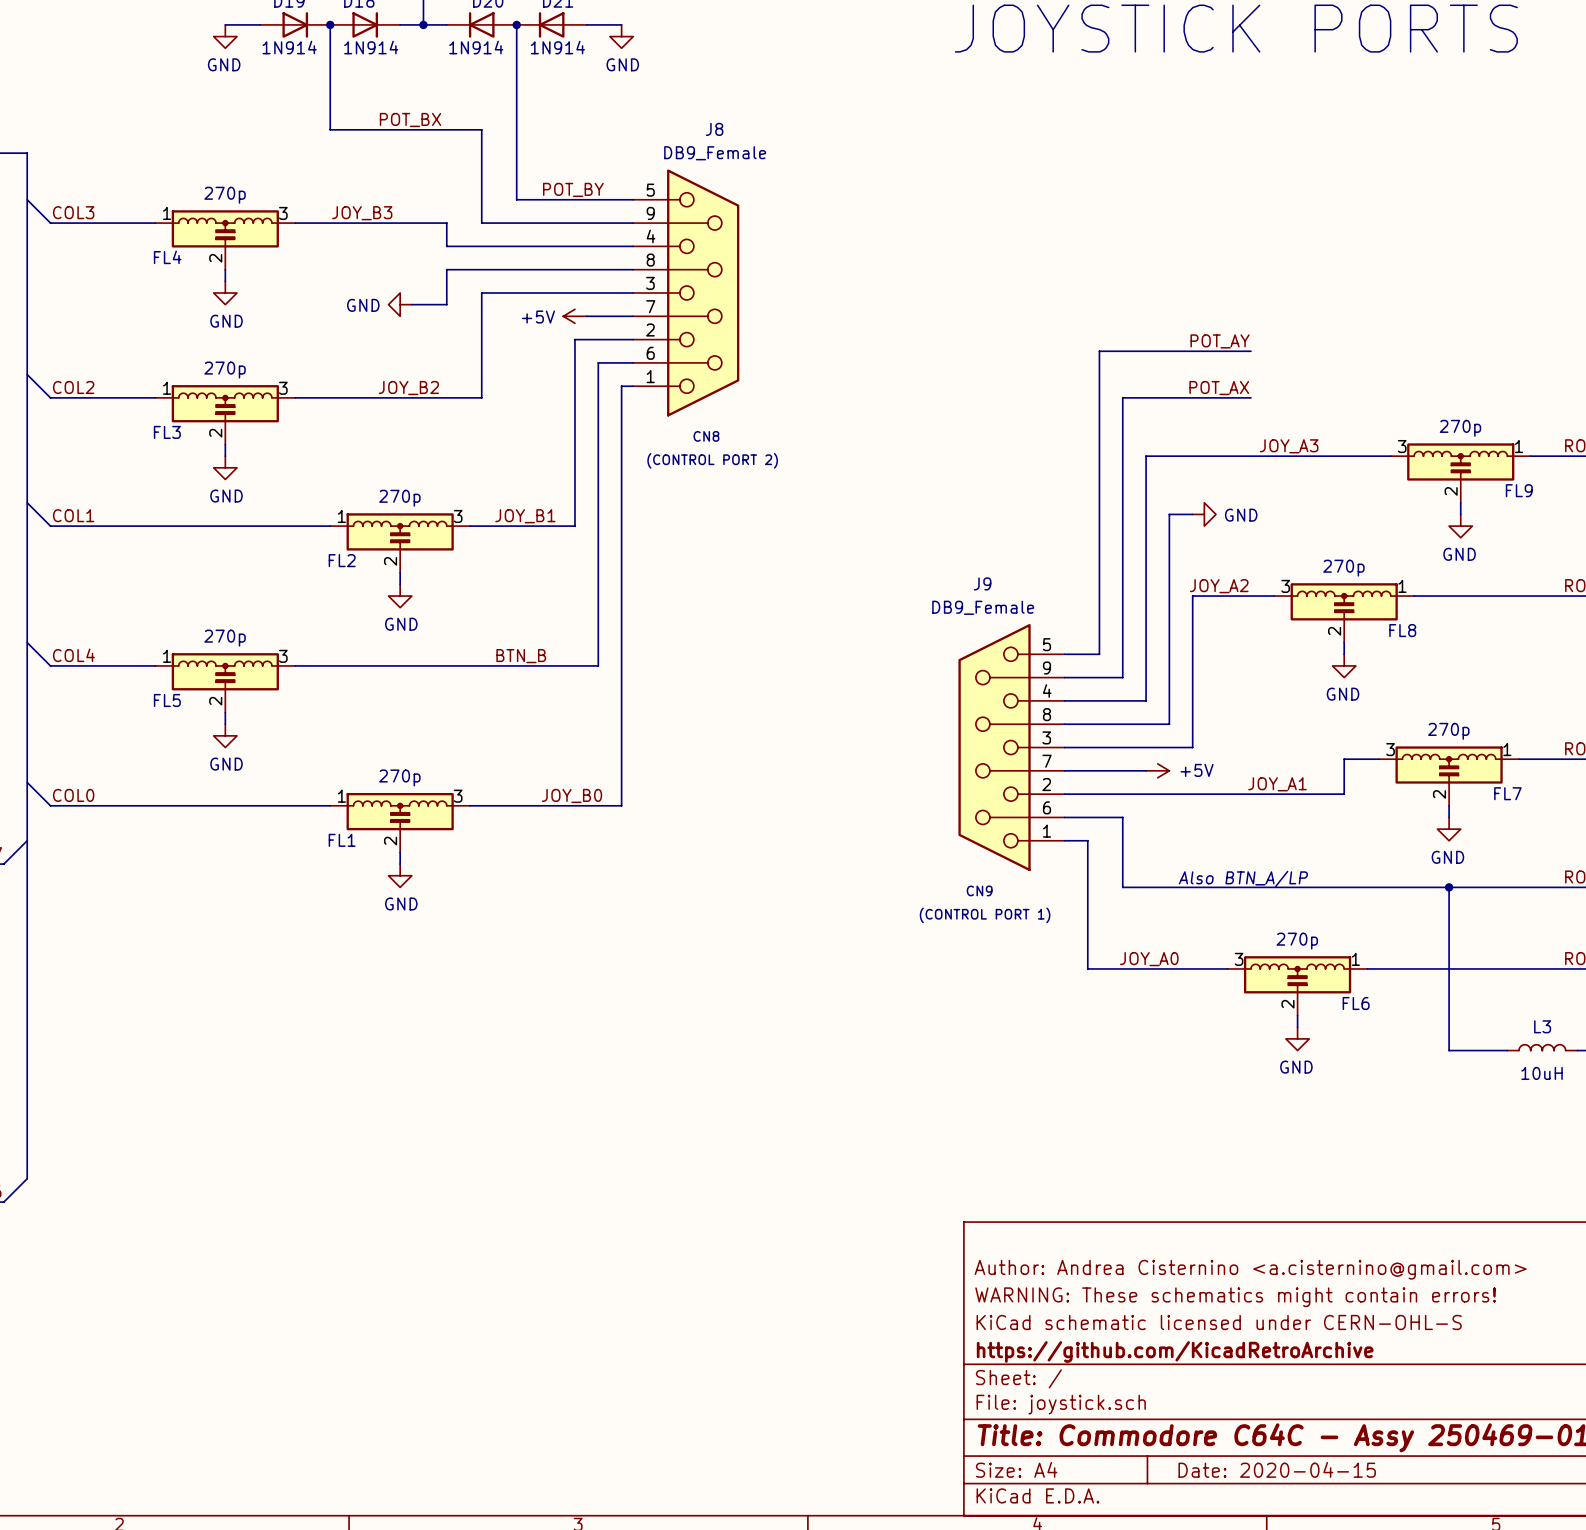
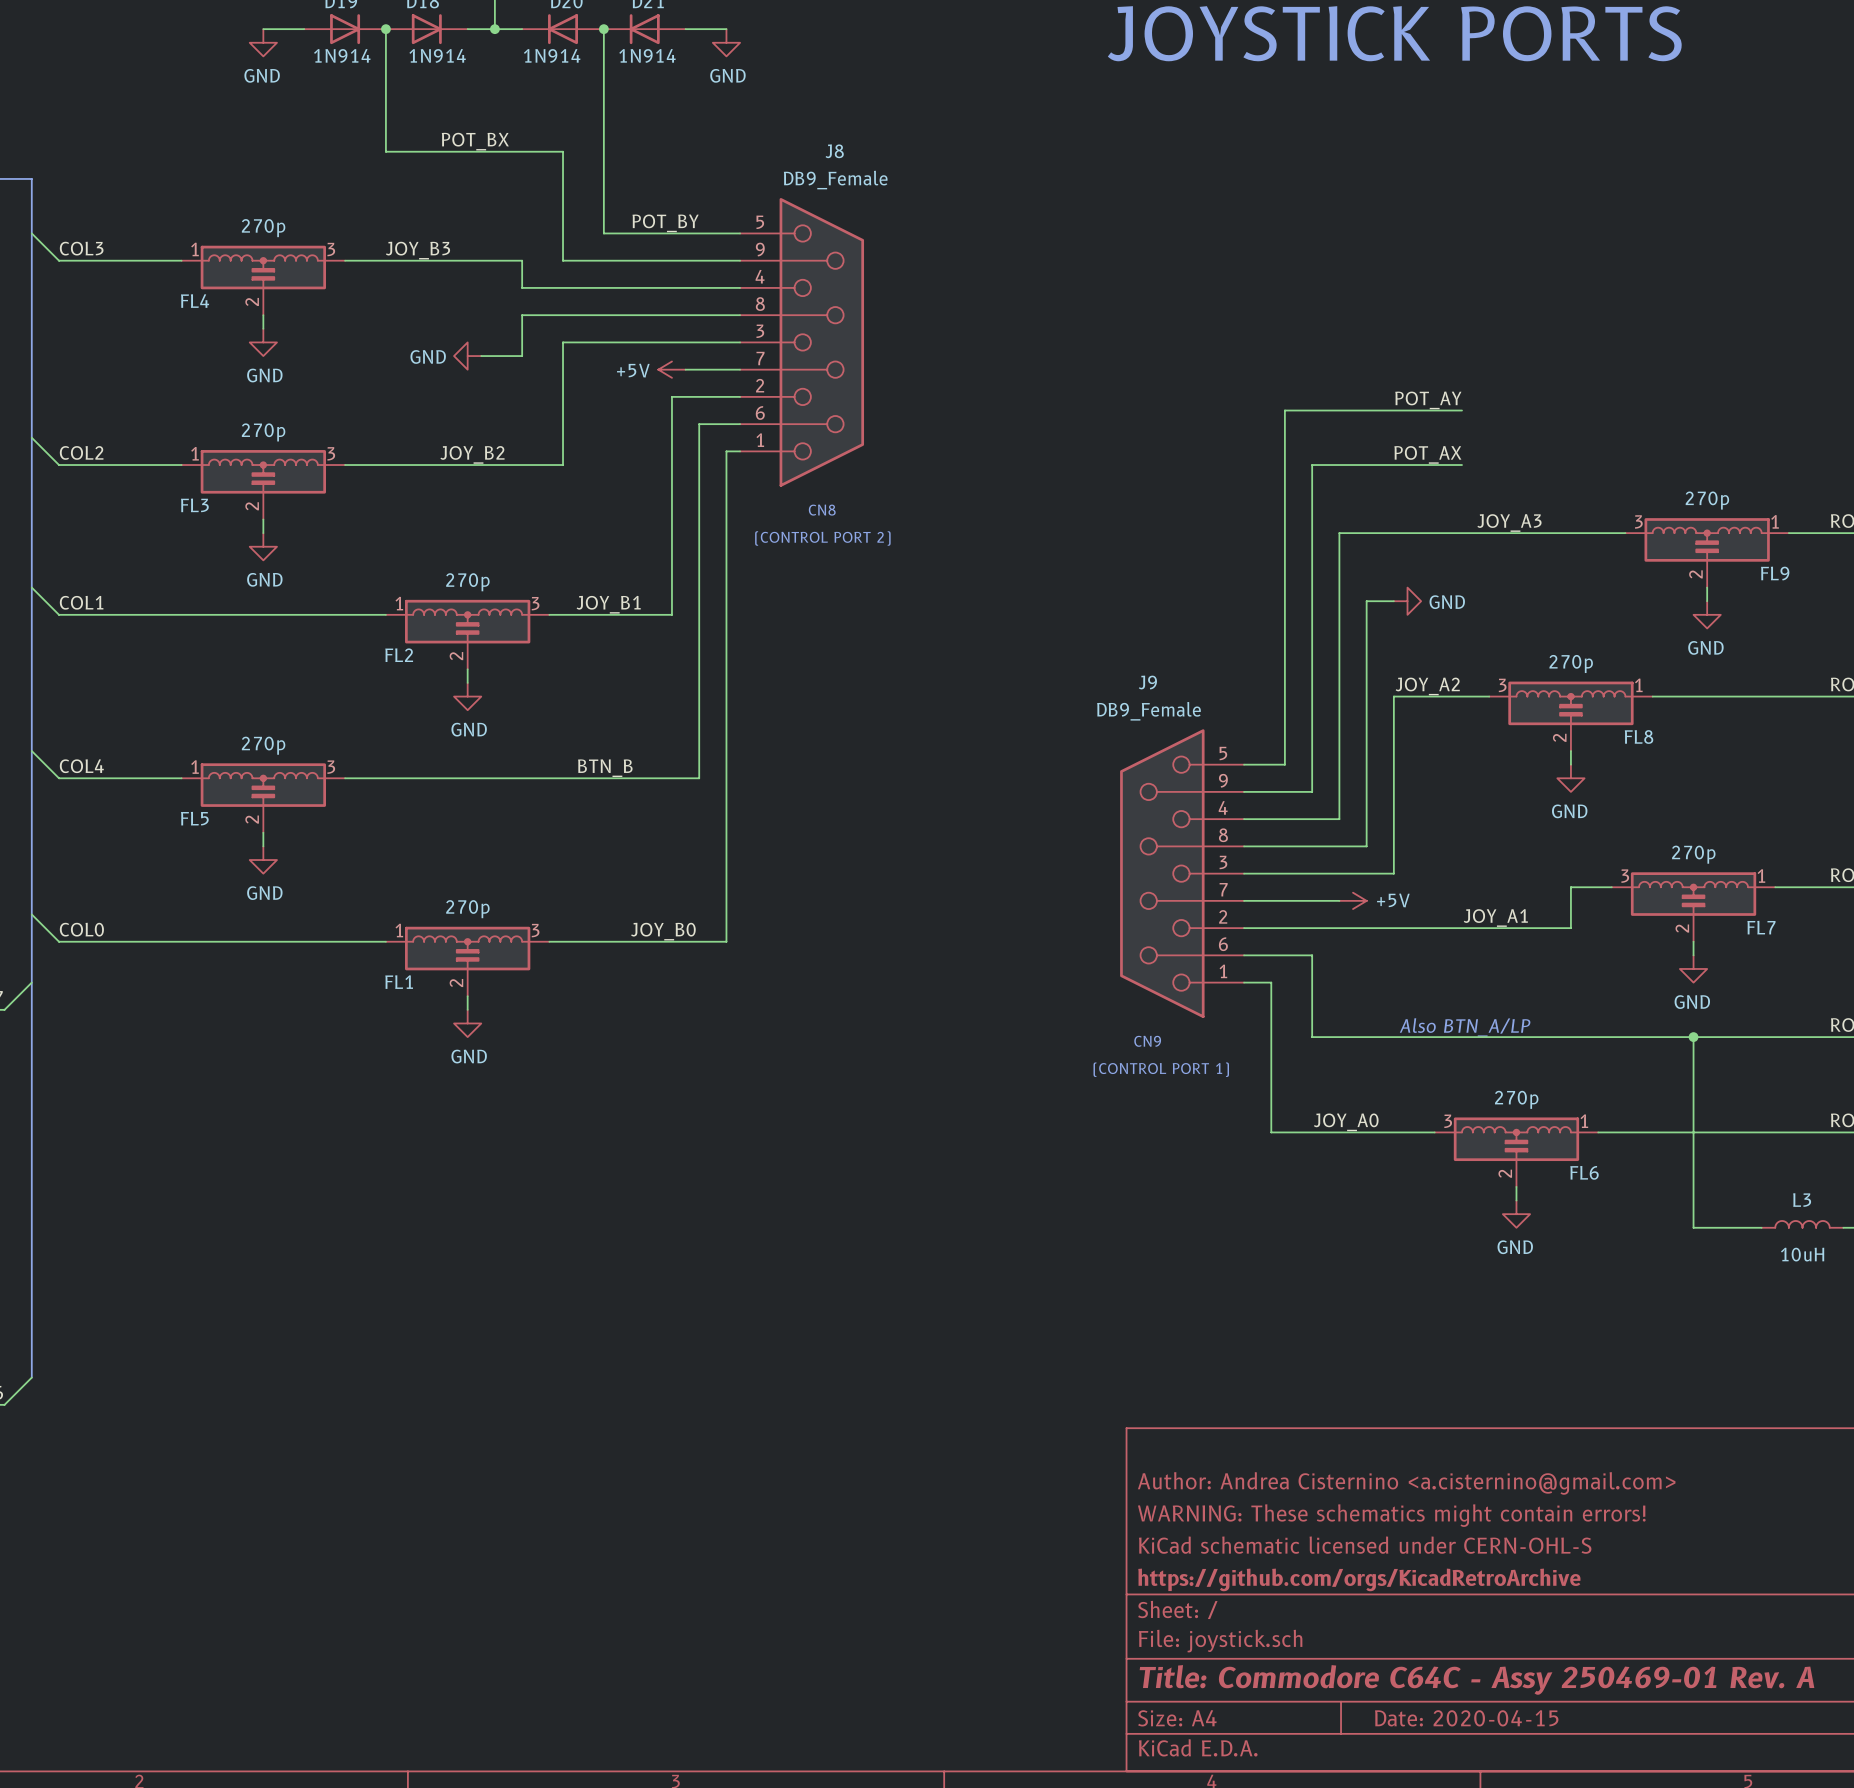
title block: https://github.com/KicadRetroArchive (1175, 1351) -> https://github.com/orgs/KicadRetroArchive (1359, 1579)

